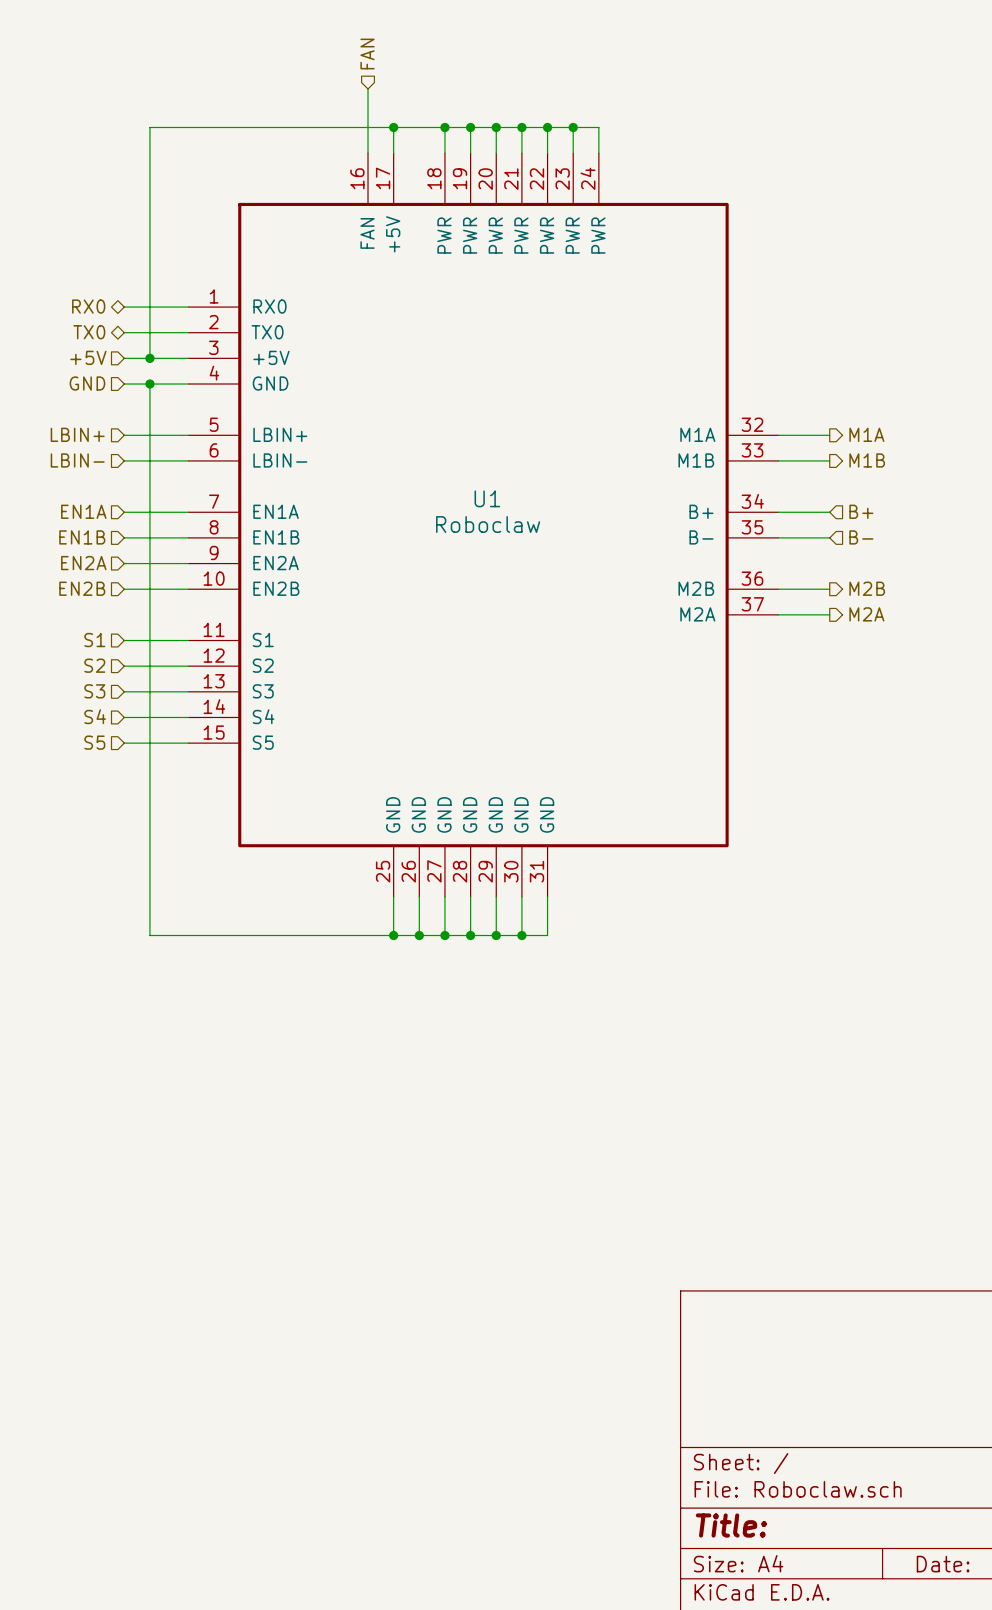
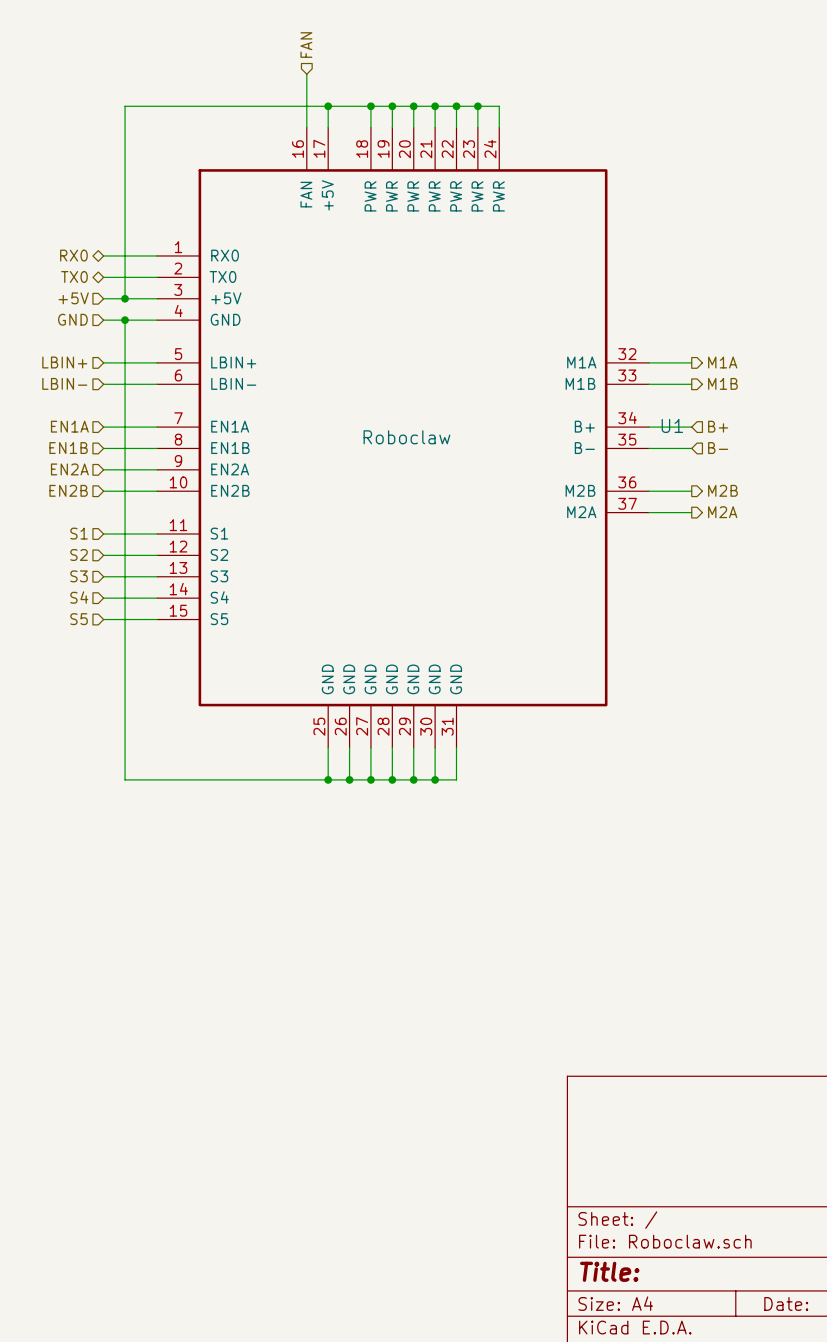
U1 name position: U1 (487, 498) -> U1 (672, 425)

